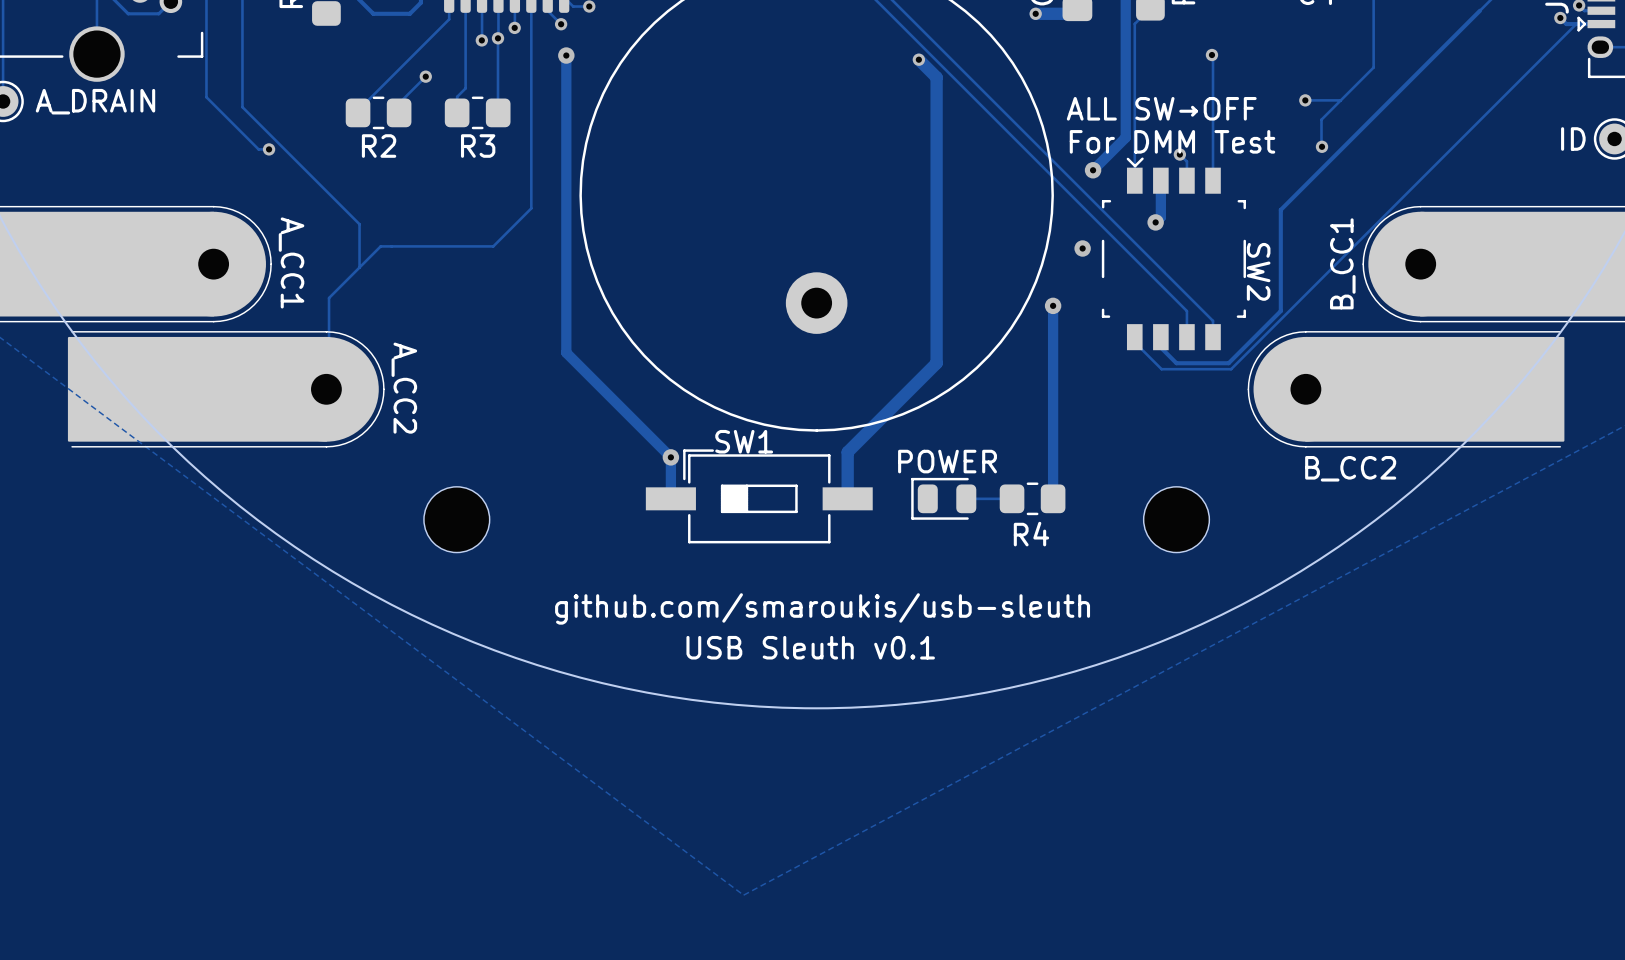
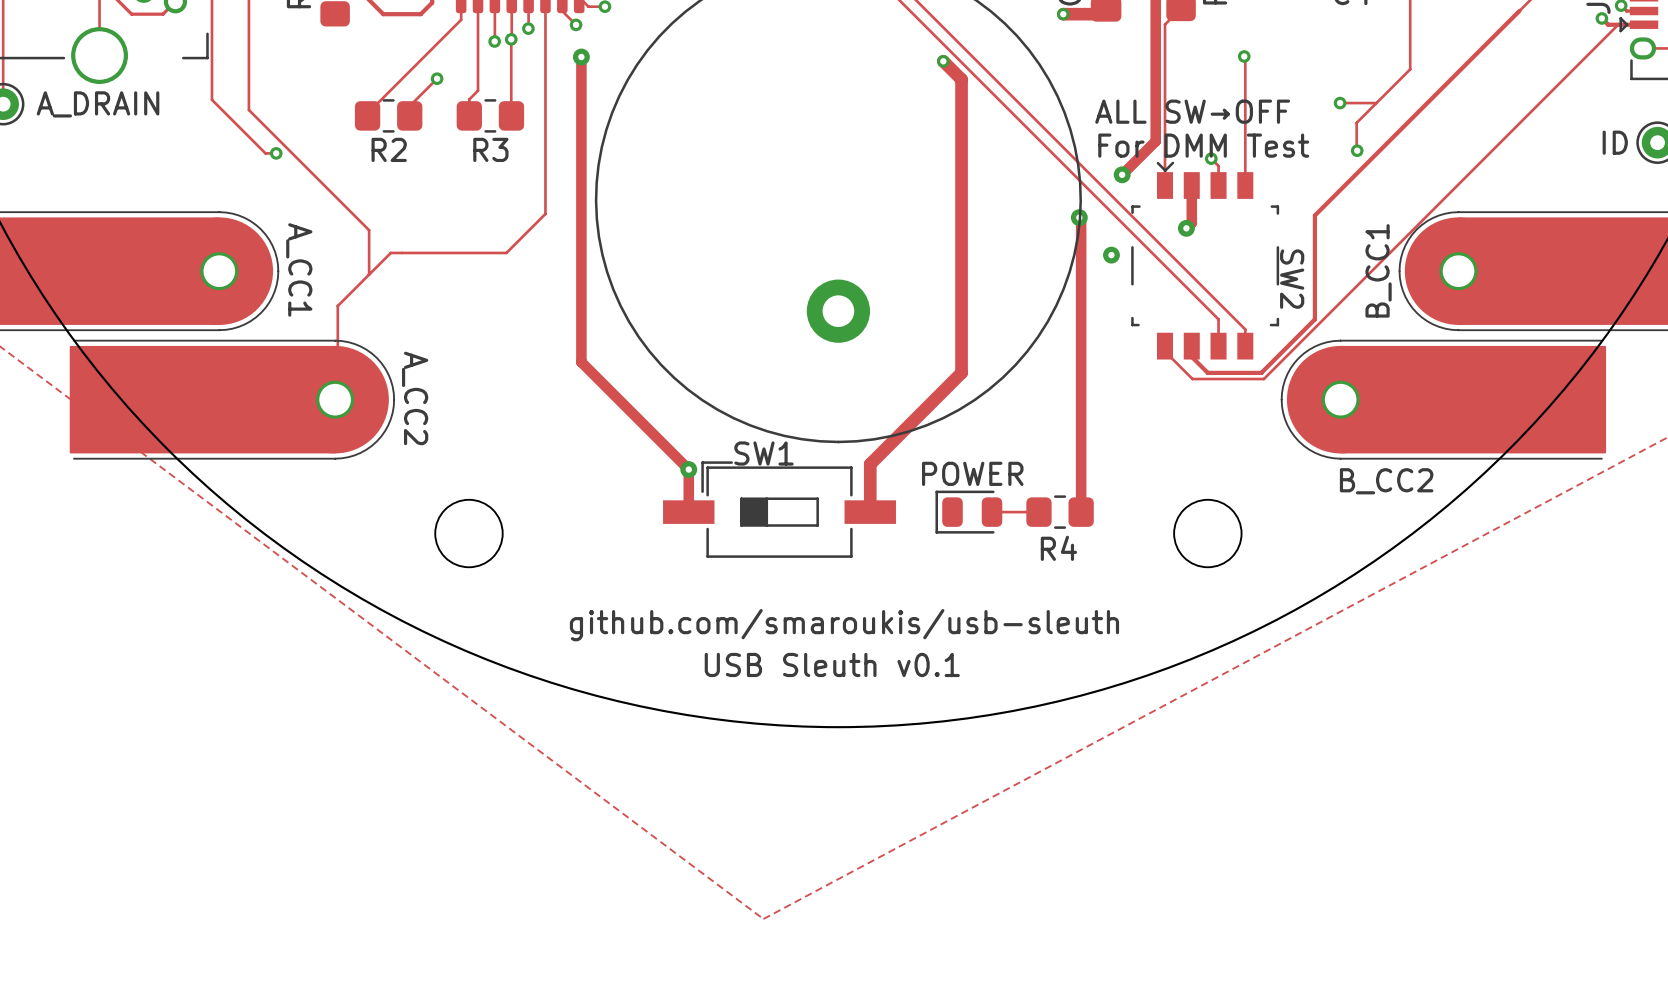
track: none -> (1079, 217) (1081, 219) (1081, 314)
via position: (1053, 305) -> (1079, 217)

